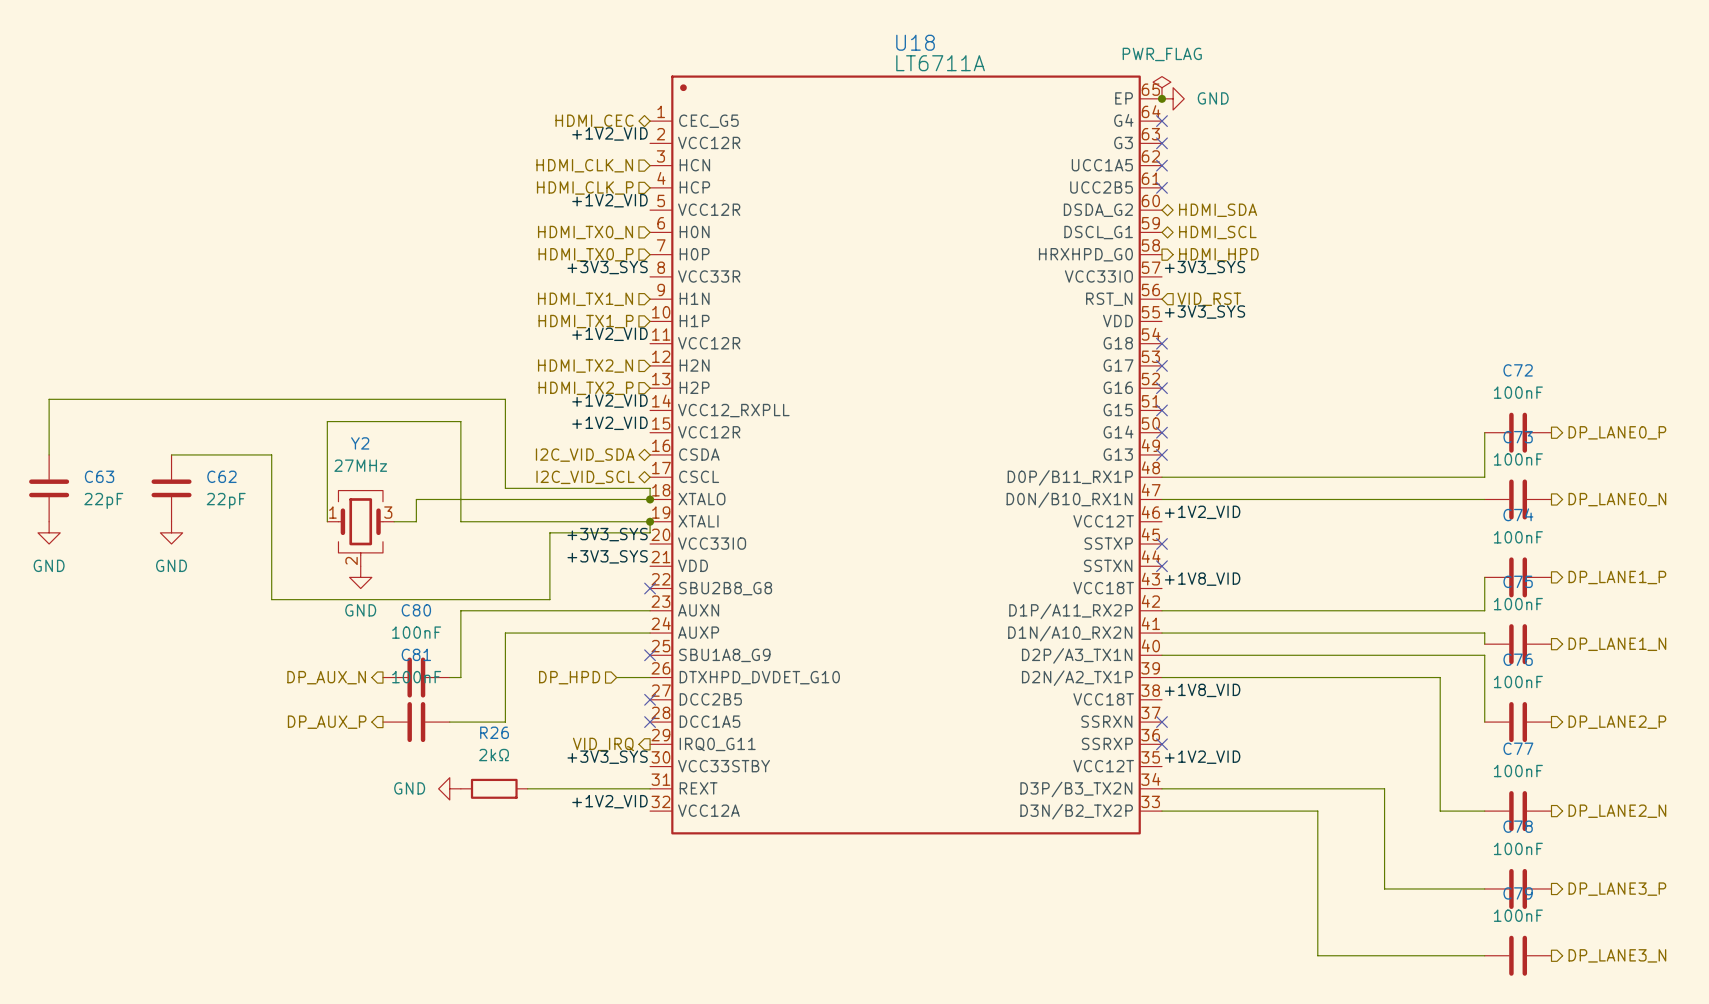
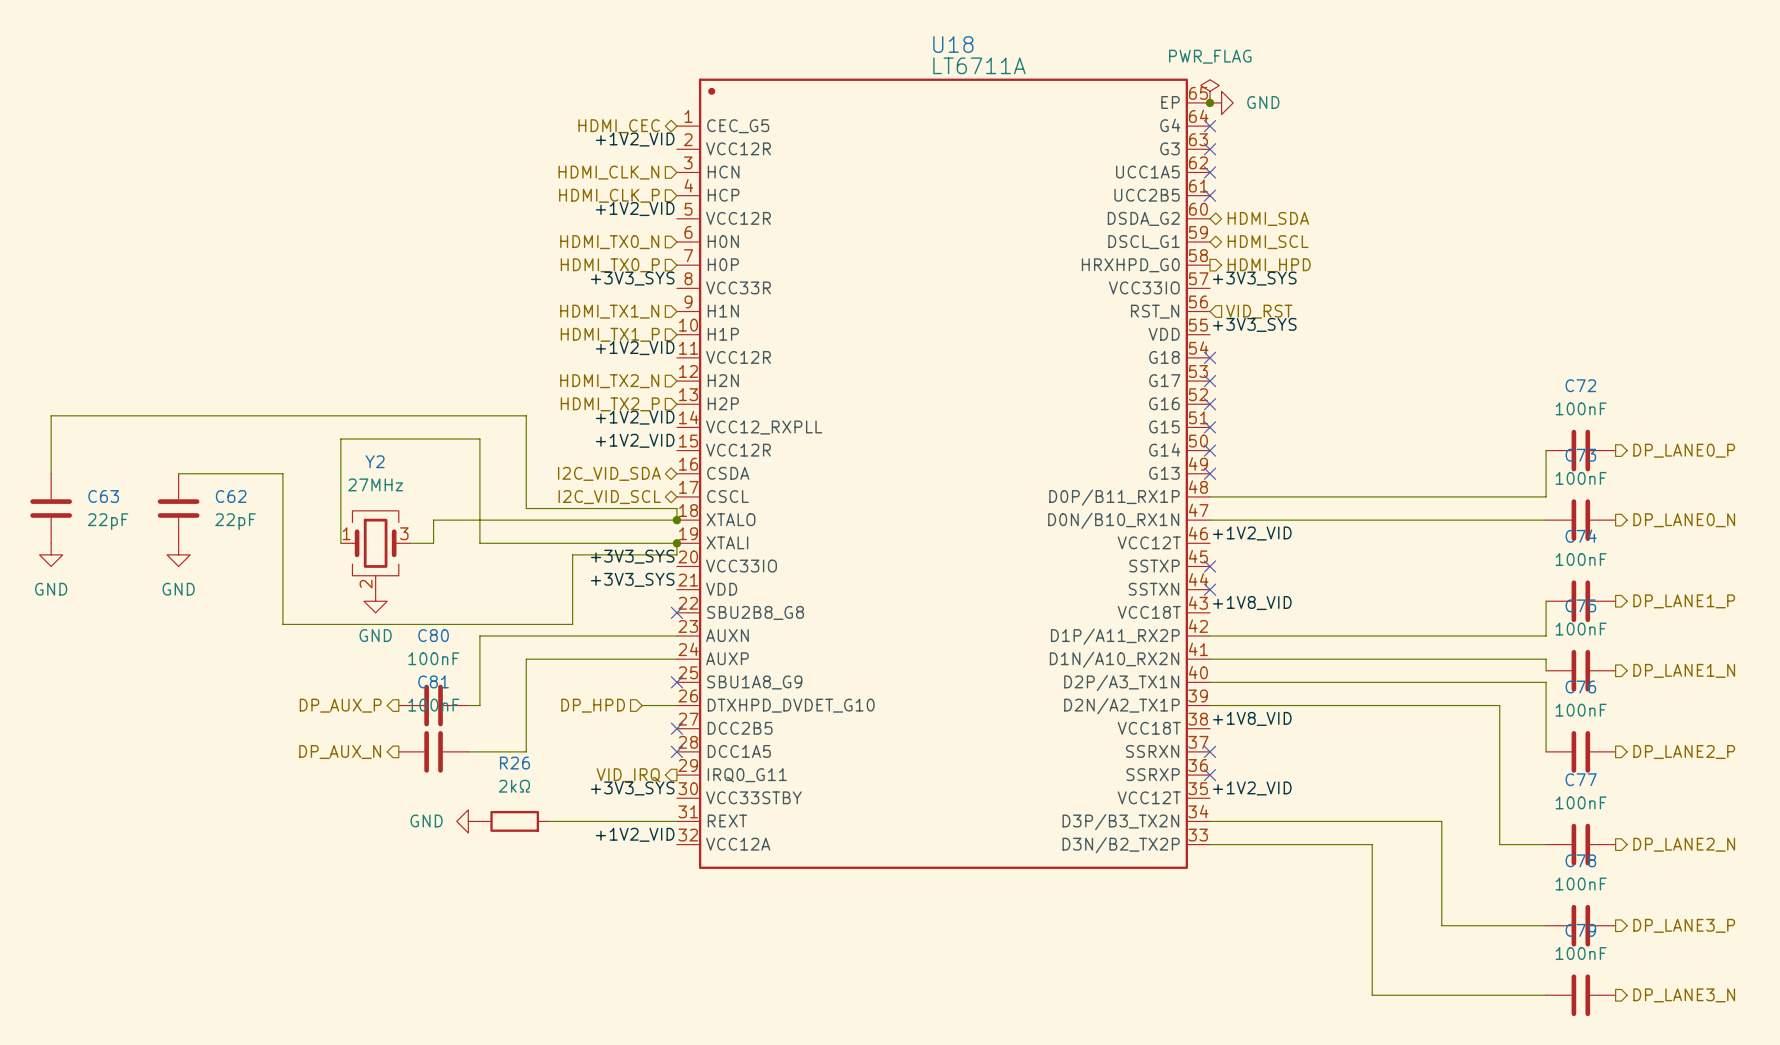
hierarchical label: DP_AUX_N (326, 677) -> DP_AUX_P (340, 705)
hierarchical label: DP_AUX_P (327, 722) -> DP_AUX_N (340, 752)

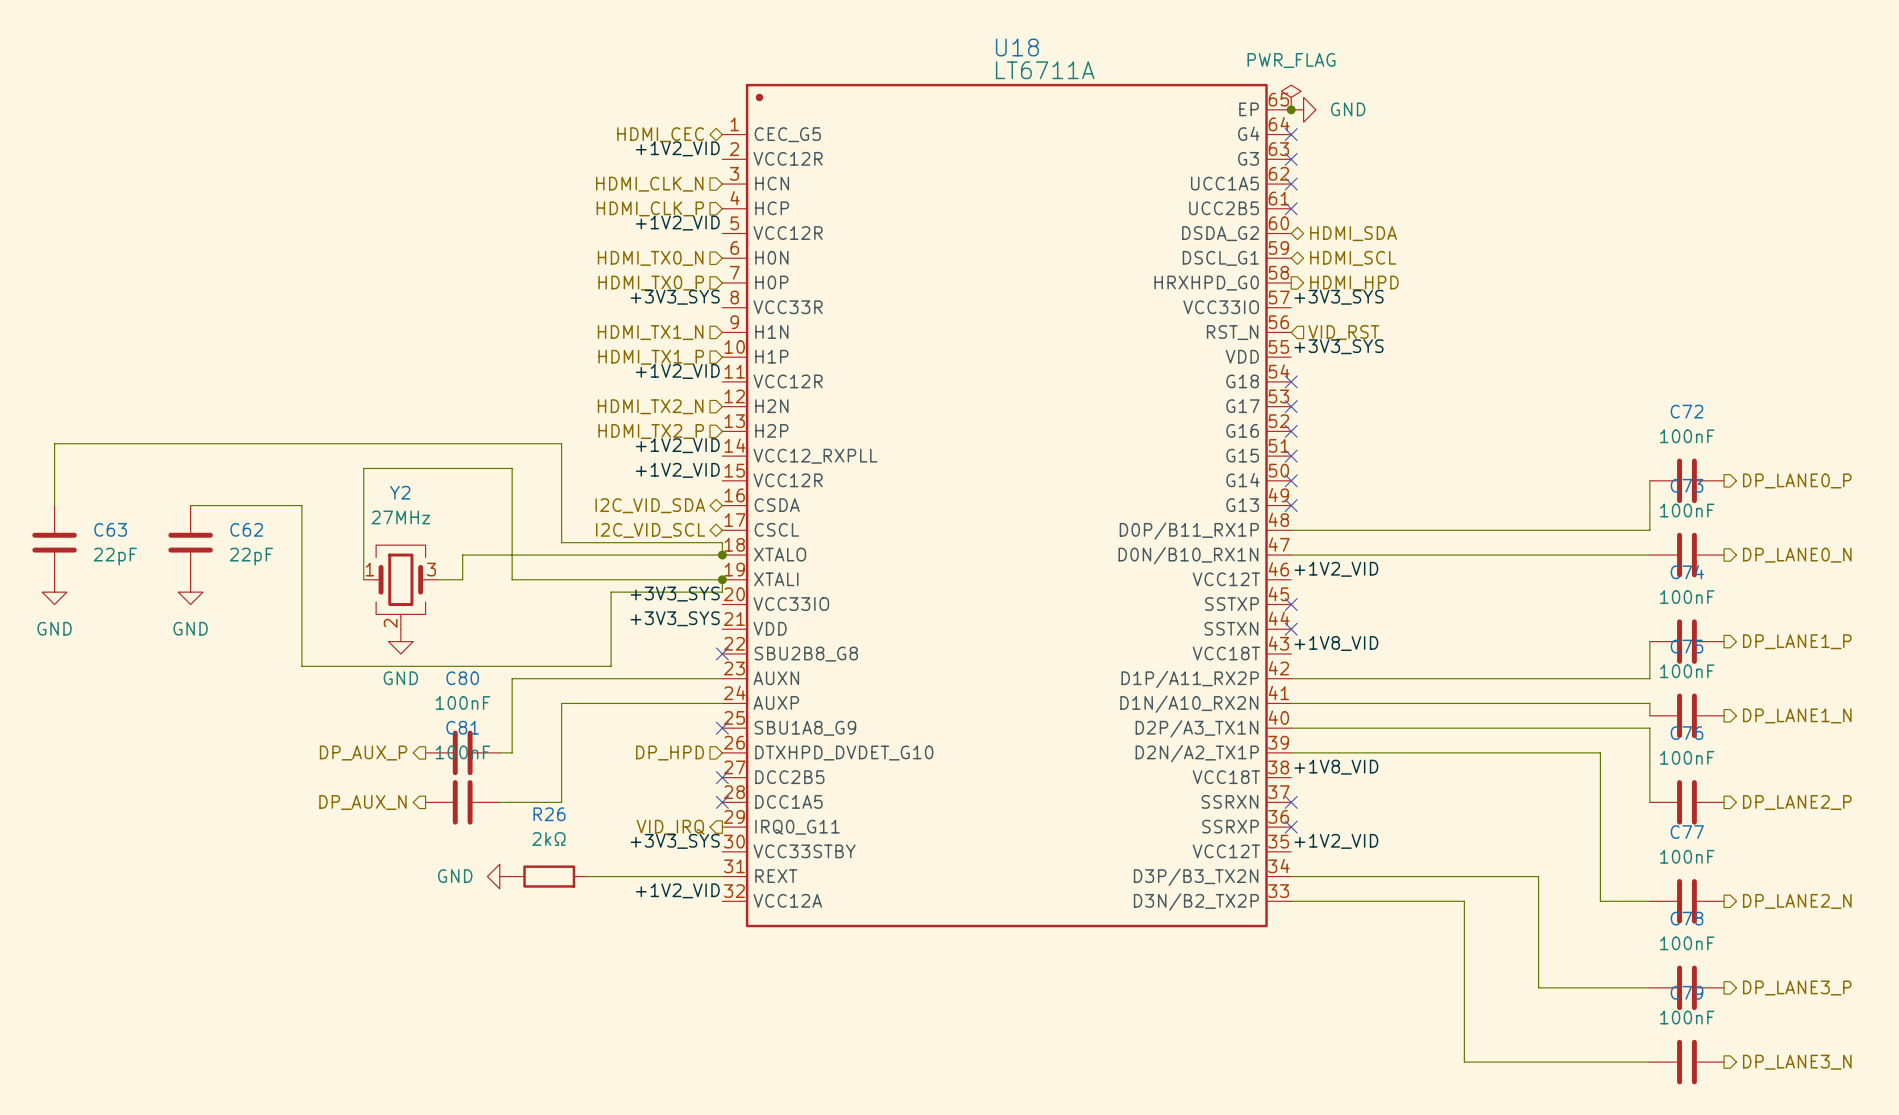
hierarchical label position: DP_HPD (593, 705) -> DP_HPD (670, 753)
wire: (642, 705) (676, 705) -> none

